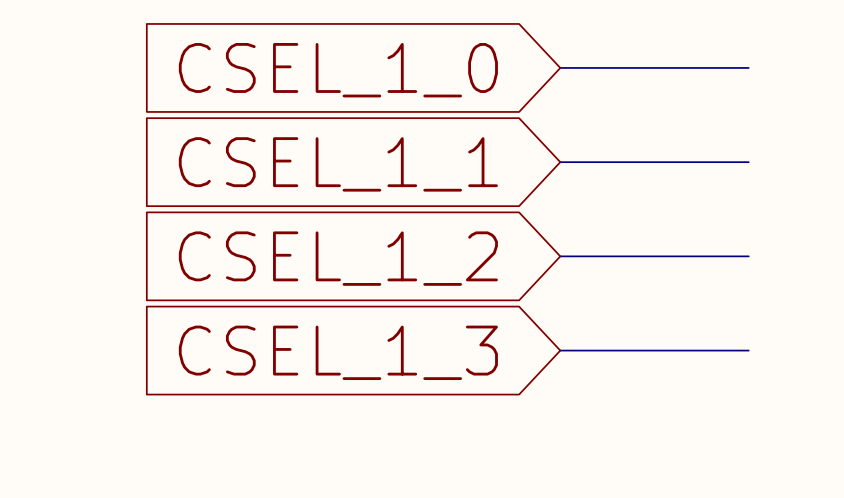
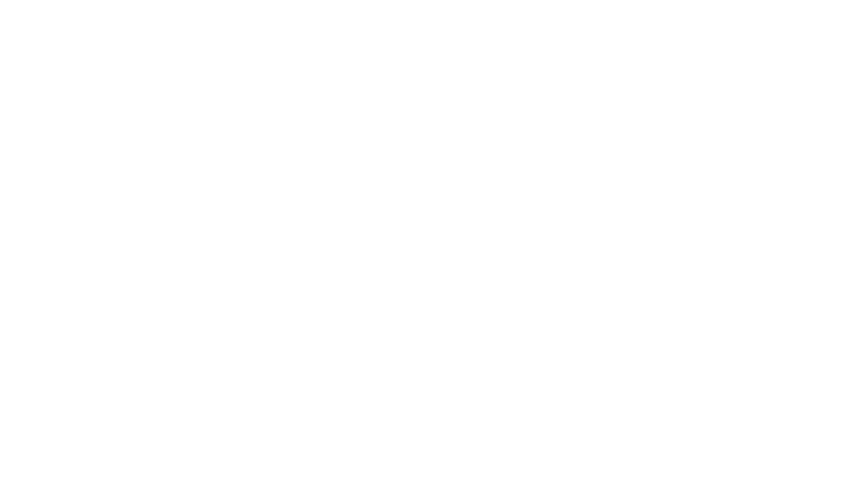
wire: (560, 67) (748, 67) -> none
global label: CSEL_1_0 (338, 70) -> none
wire: (560, 162) (748, 162) -> none
global label: CSEL_1_1 (338, 164) -> none
wire: (560, 256) (748, 256) -> none
global label: CSEL_1_2 (338, 258) -> none
wire: (560, 350) (748, 350) -> none
global label: CSEL_1_3 (338, 352) -> none

